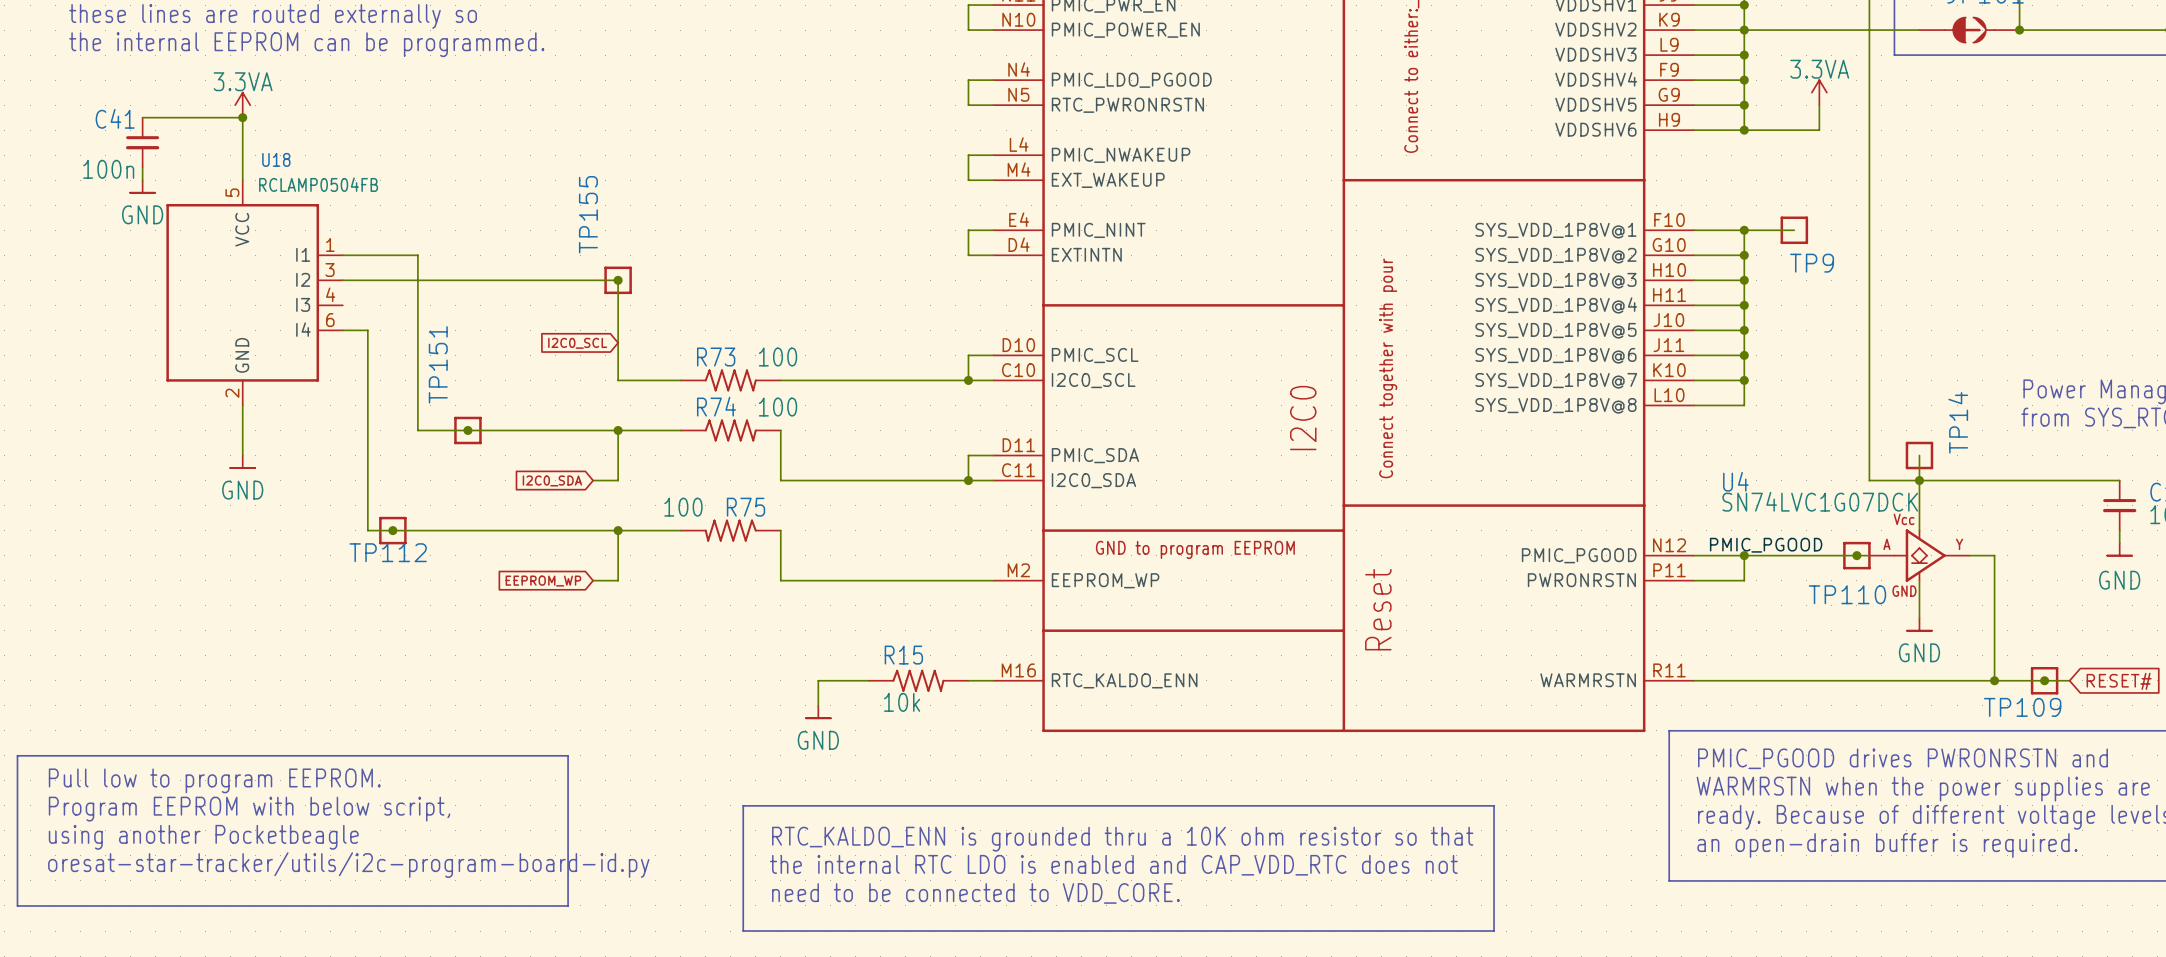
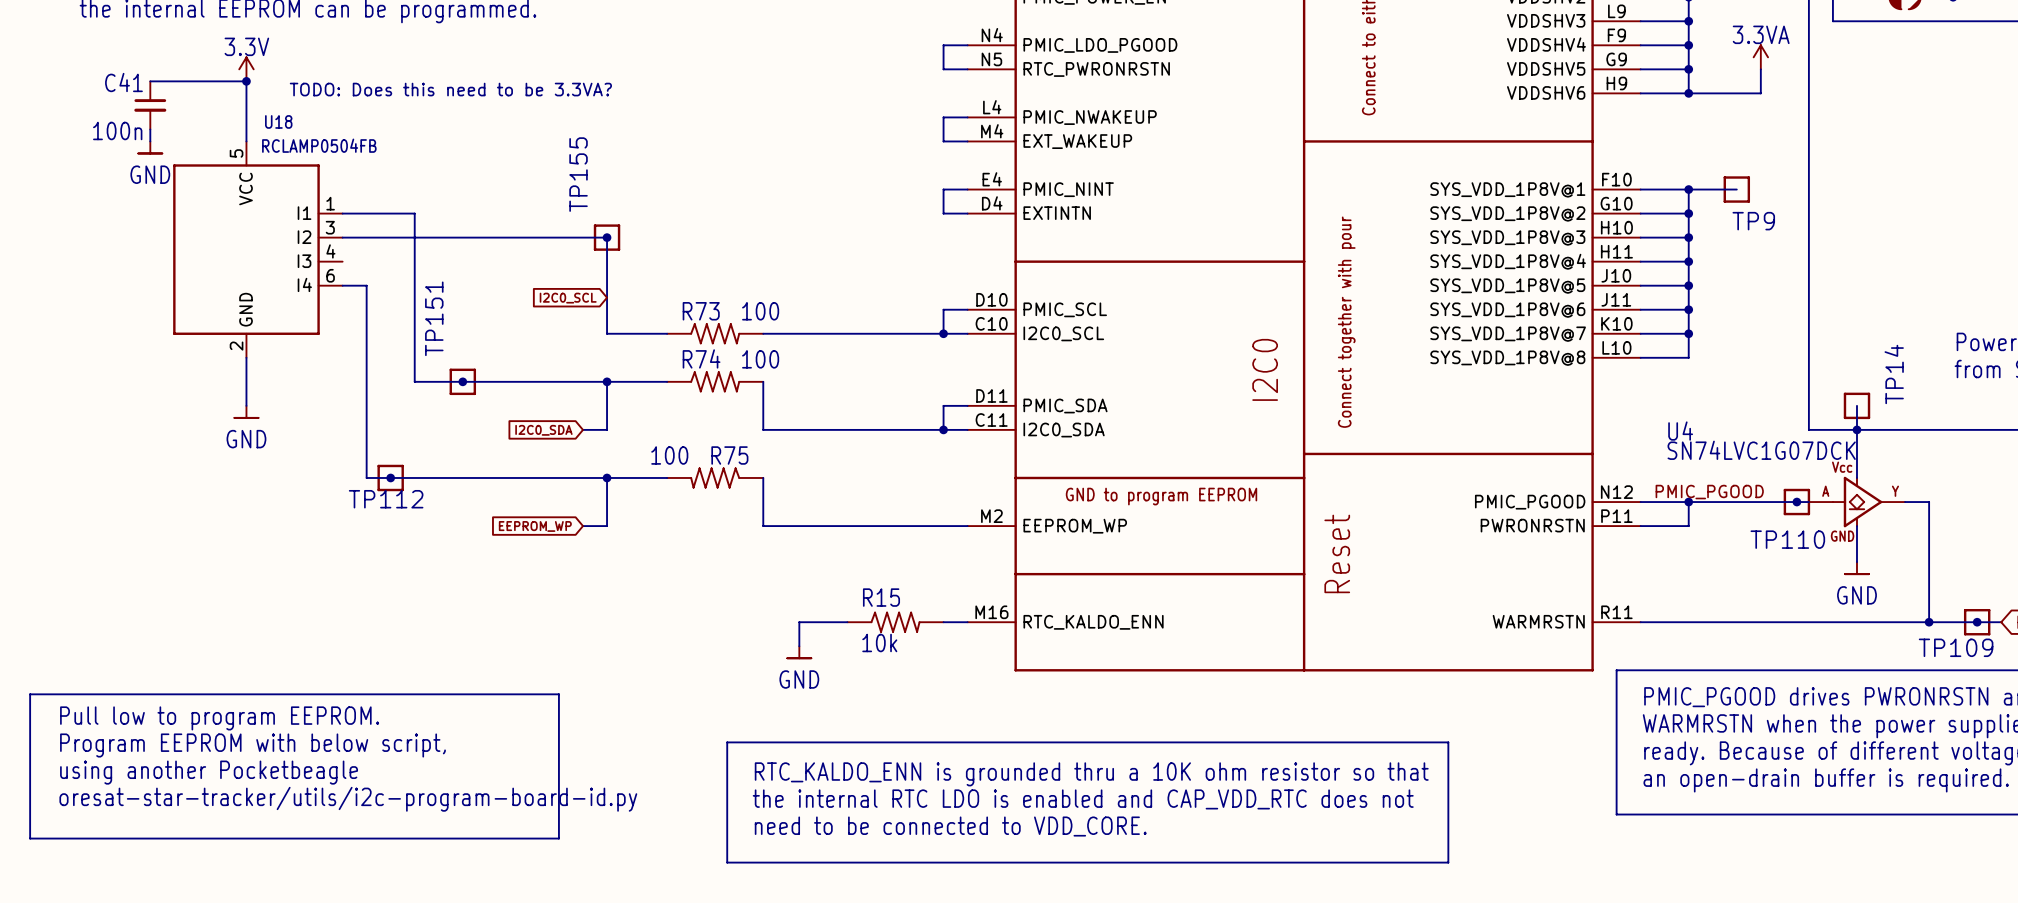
power symbol: 3.3VA (242, 105) -> 3.3V (246, 69)
text: none -> TODO: Does this need to be 3.3VA? (450, 89)

